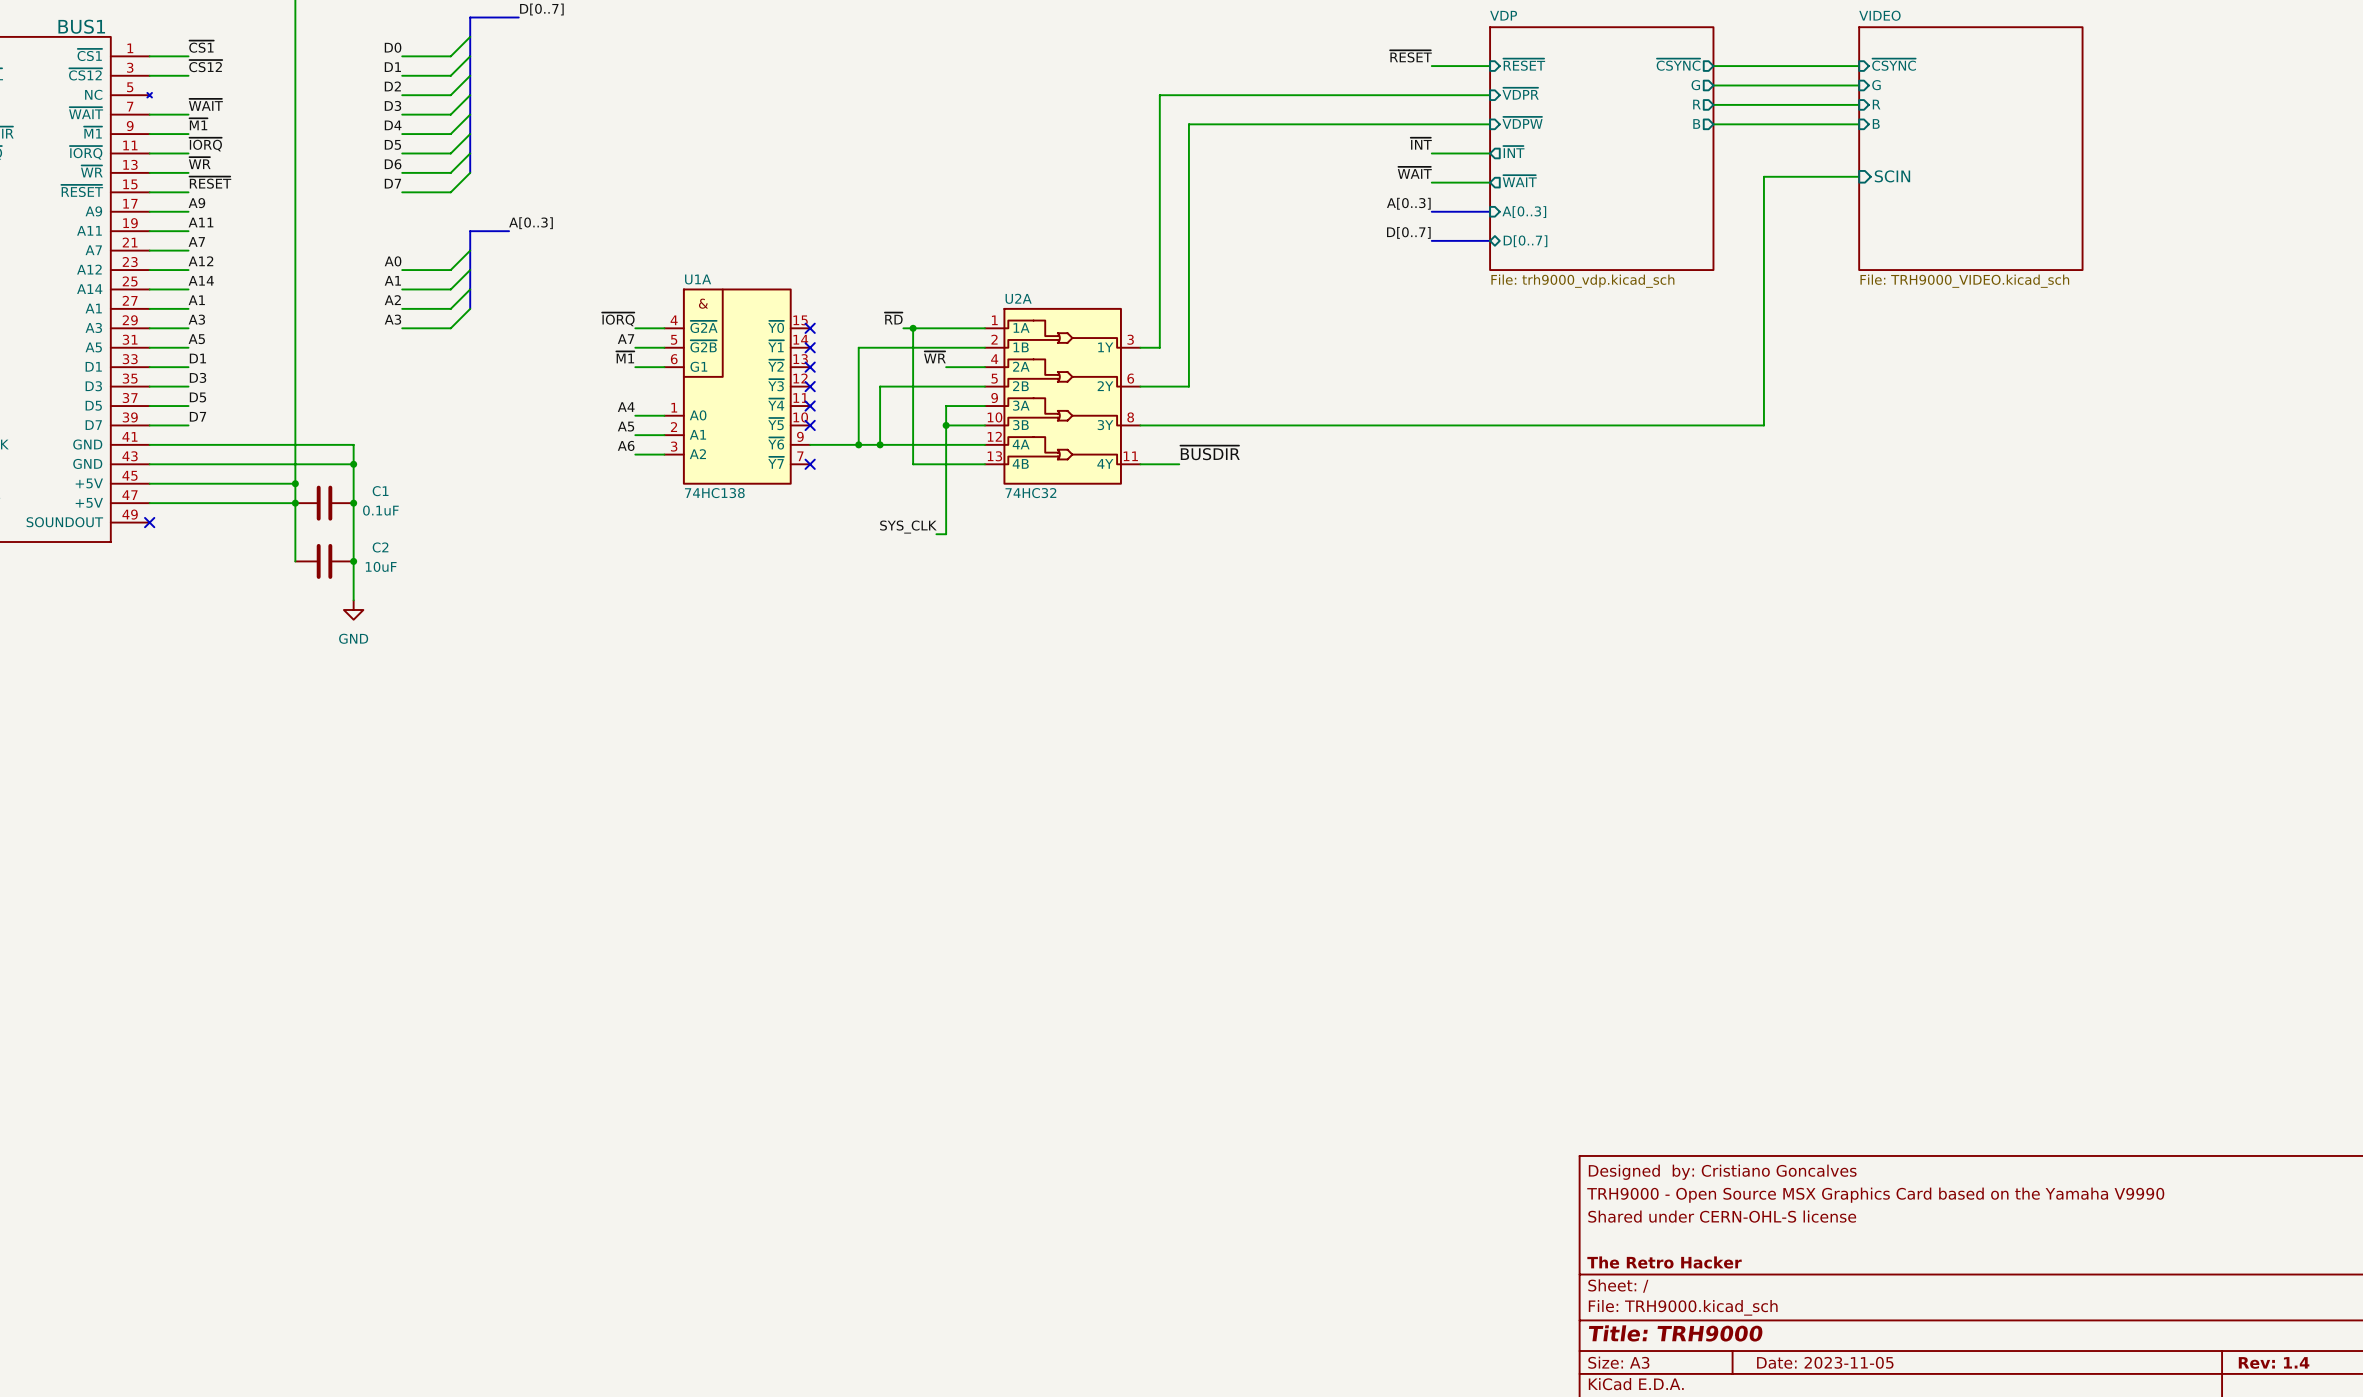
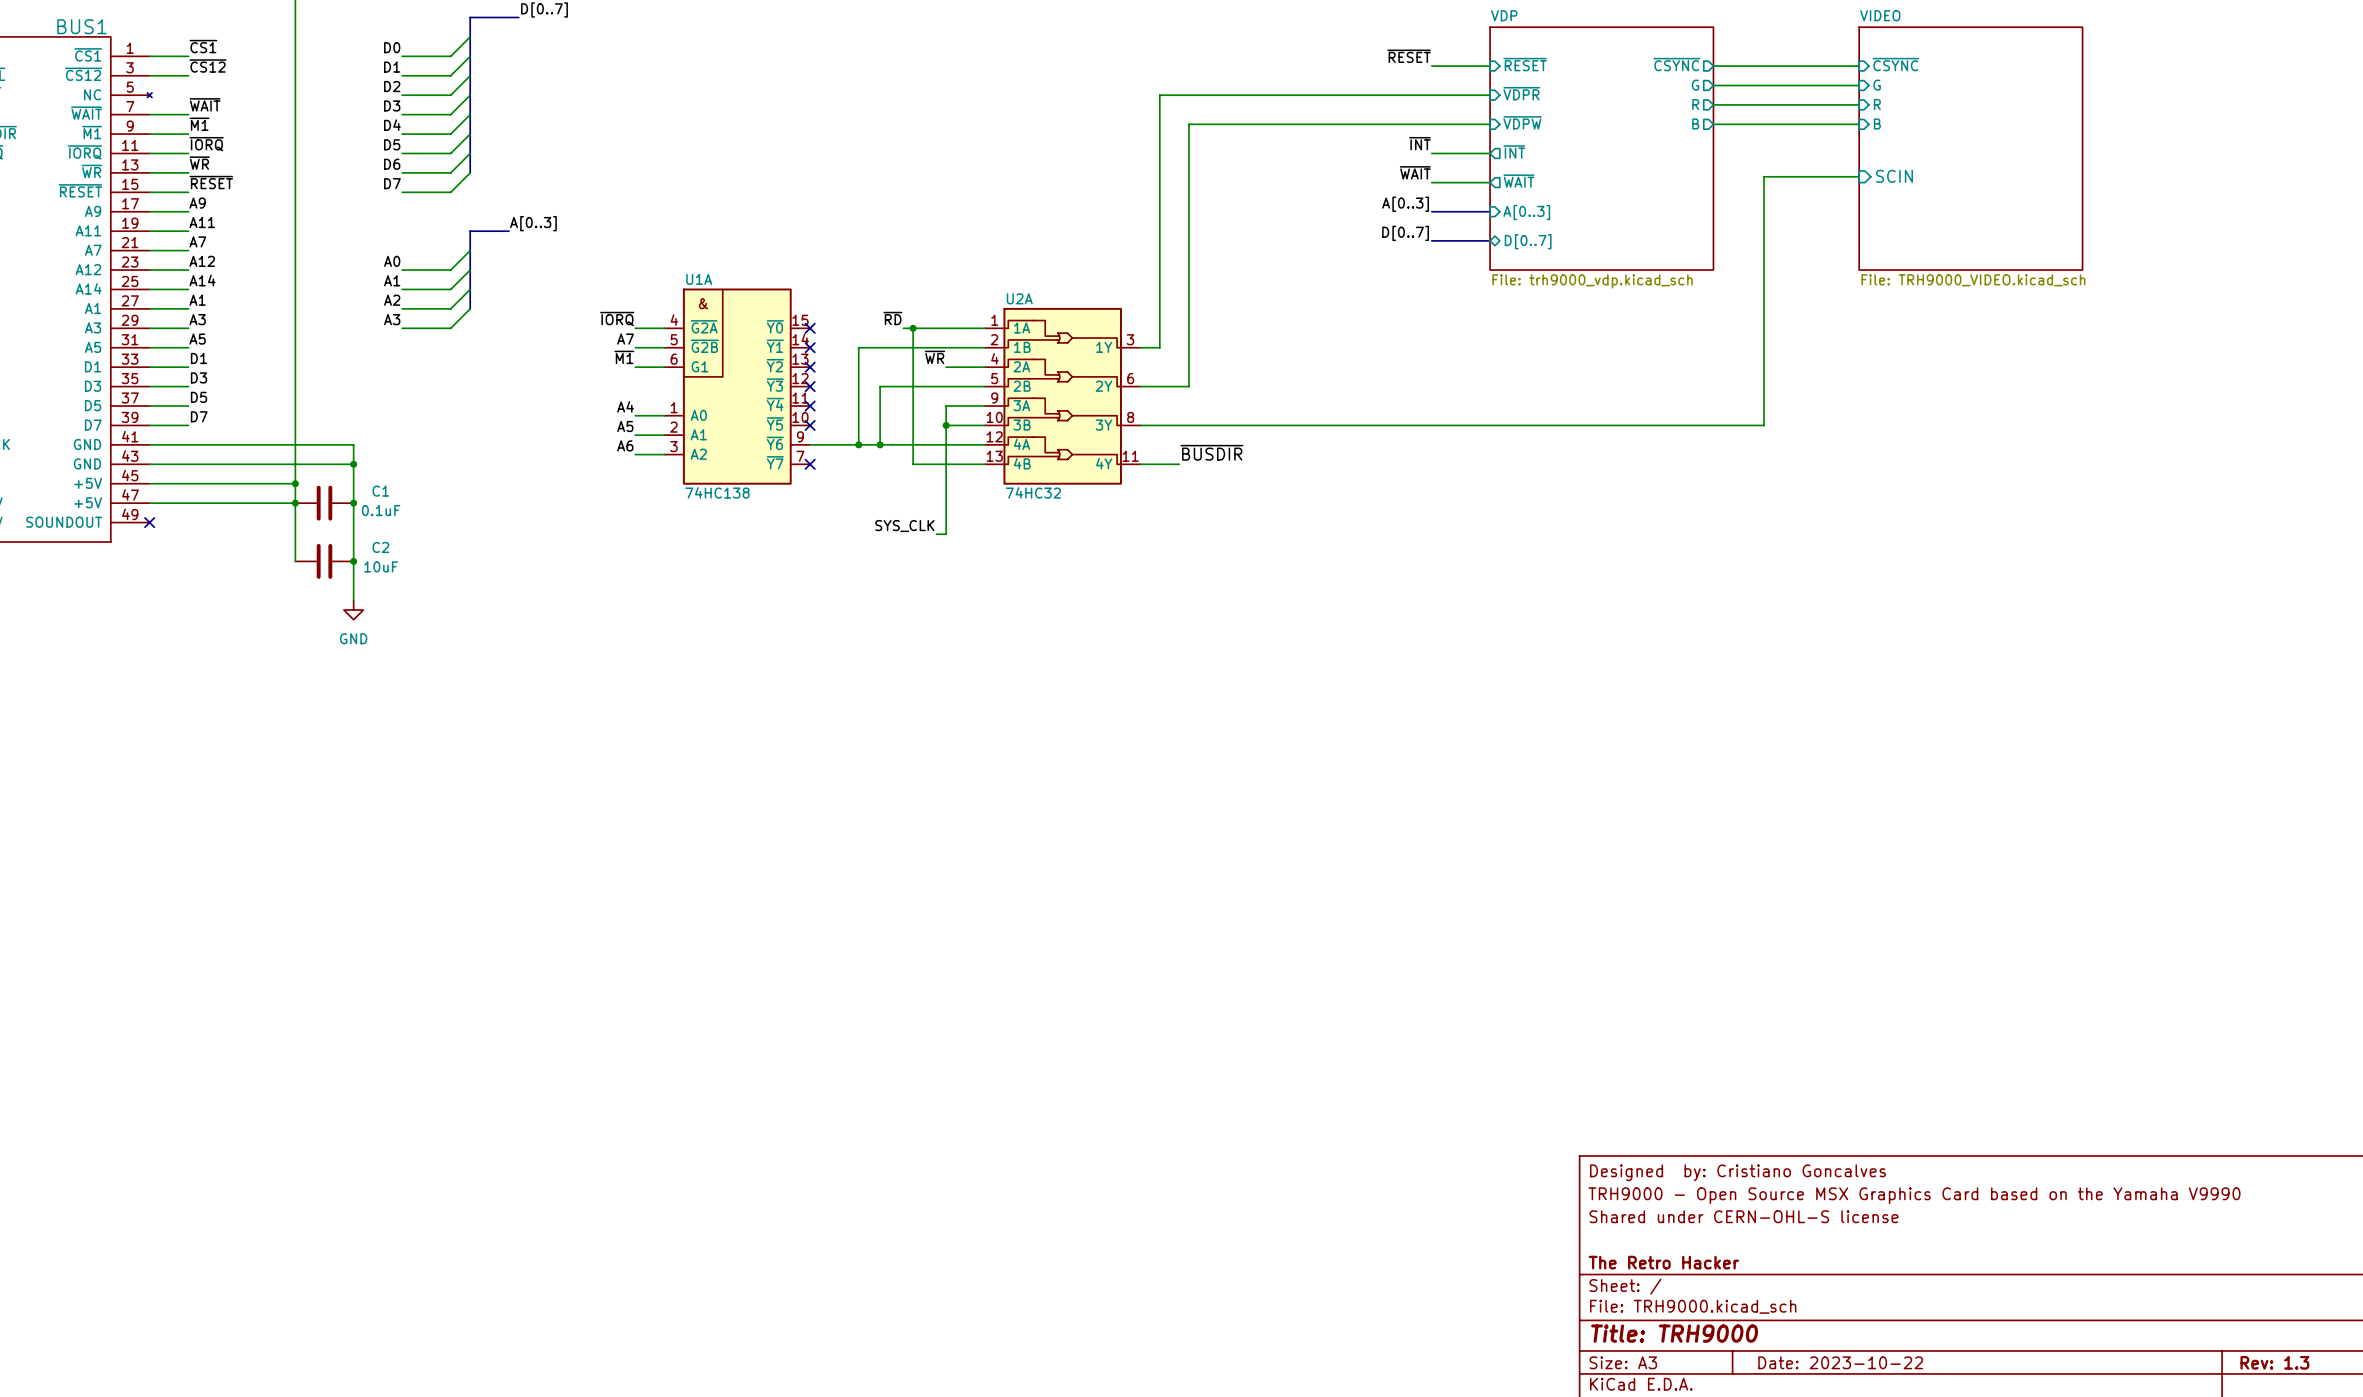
title block: Date: 2023-11-05 (1825, 1362) -> Date: 2023-10-22 (1840, 1362)
title block: Rev: 1.4 (2274, 1362) -> Rev: 1.3 (2274, 1362)

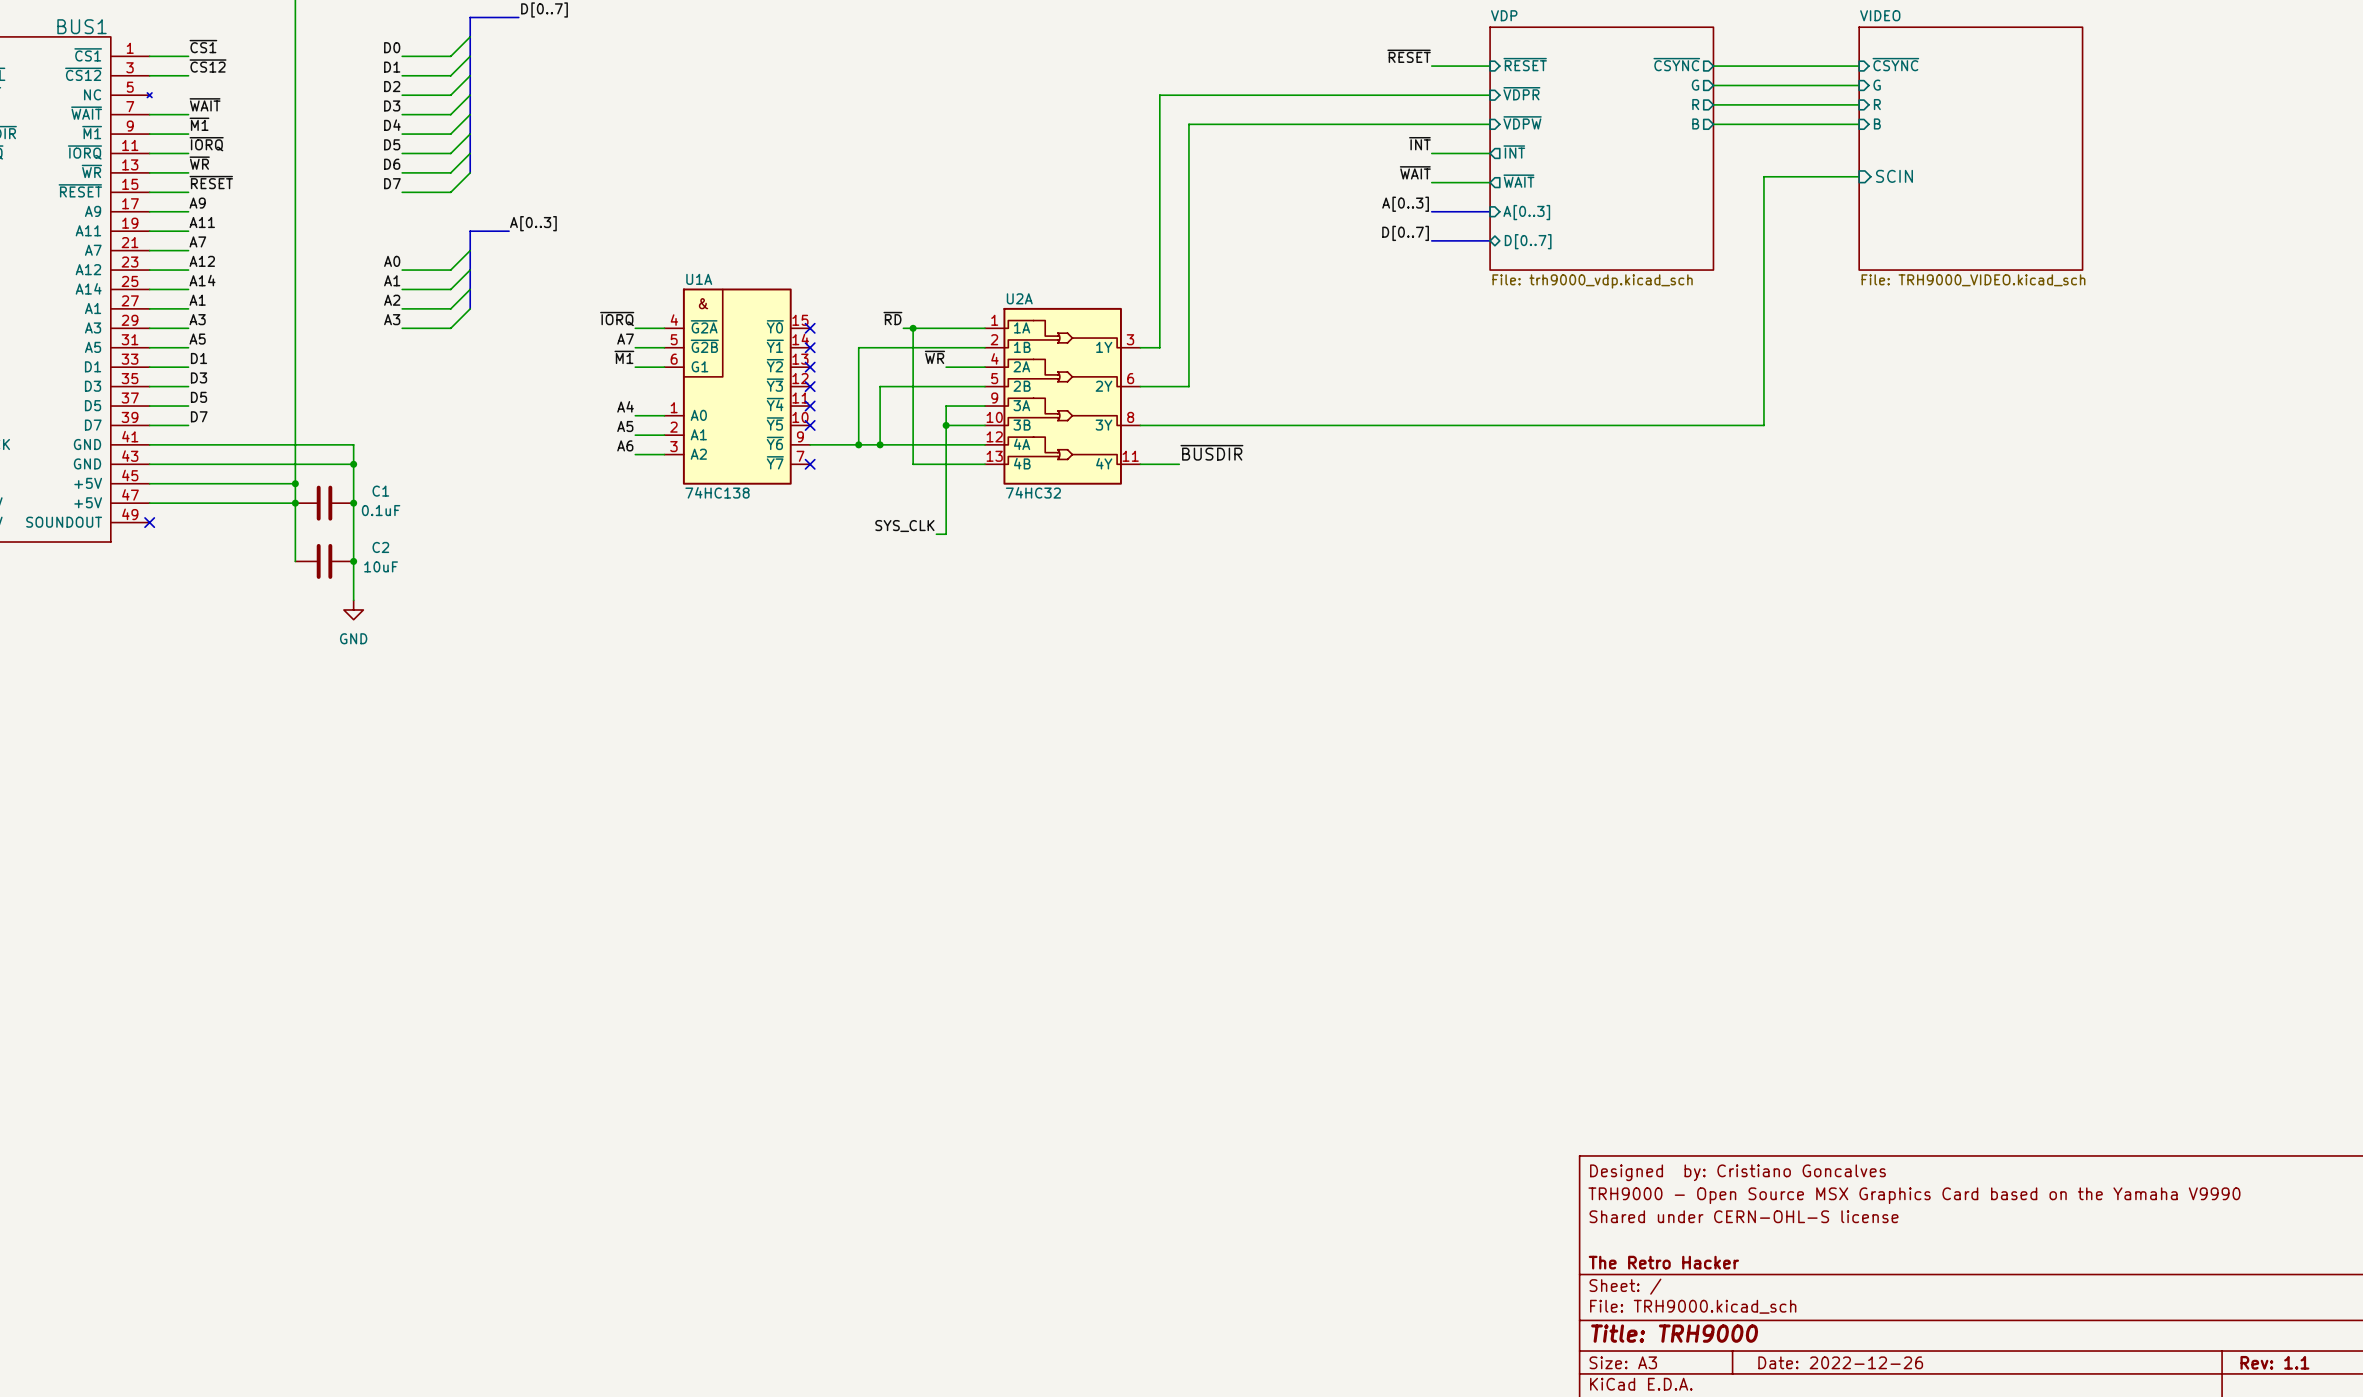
title block: Date: 2023-10-22 (1840, 1362) -> Date: 2022-12-26 (1840, 1362)
title block: Rev: 1.3 (2274, 1362) -> Rev: 1.1 (2274, 1362)

